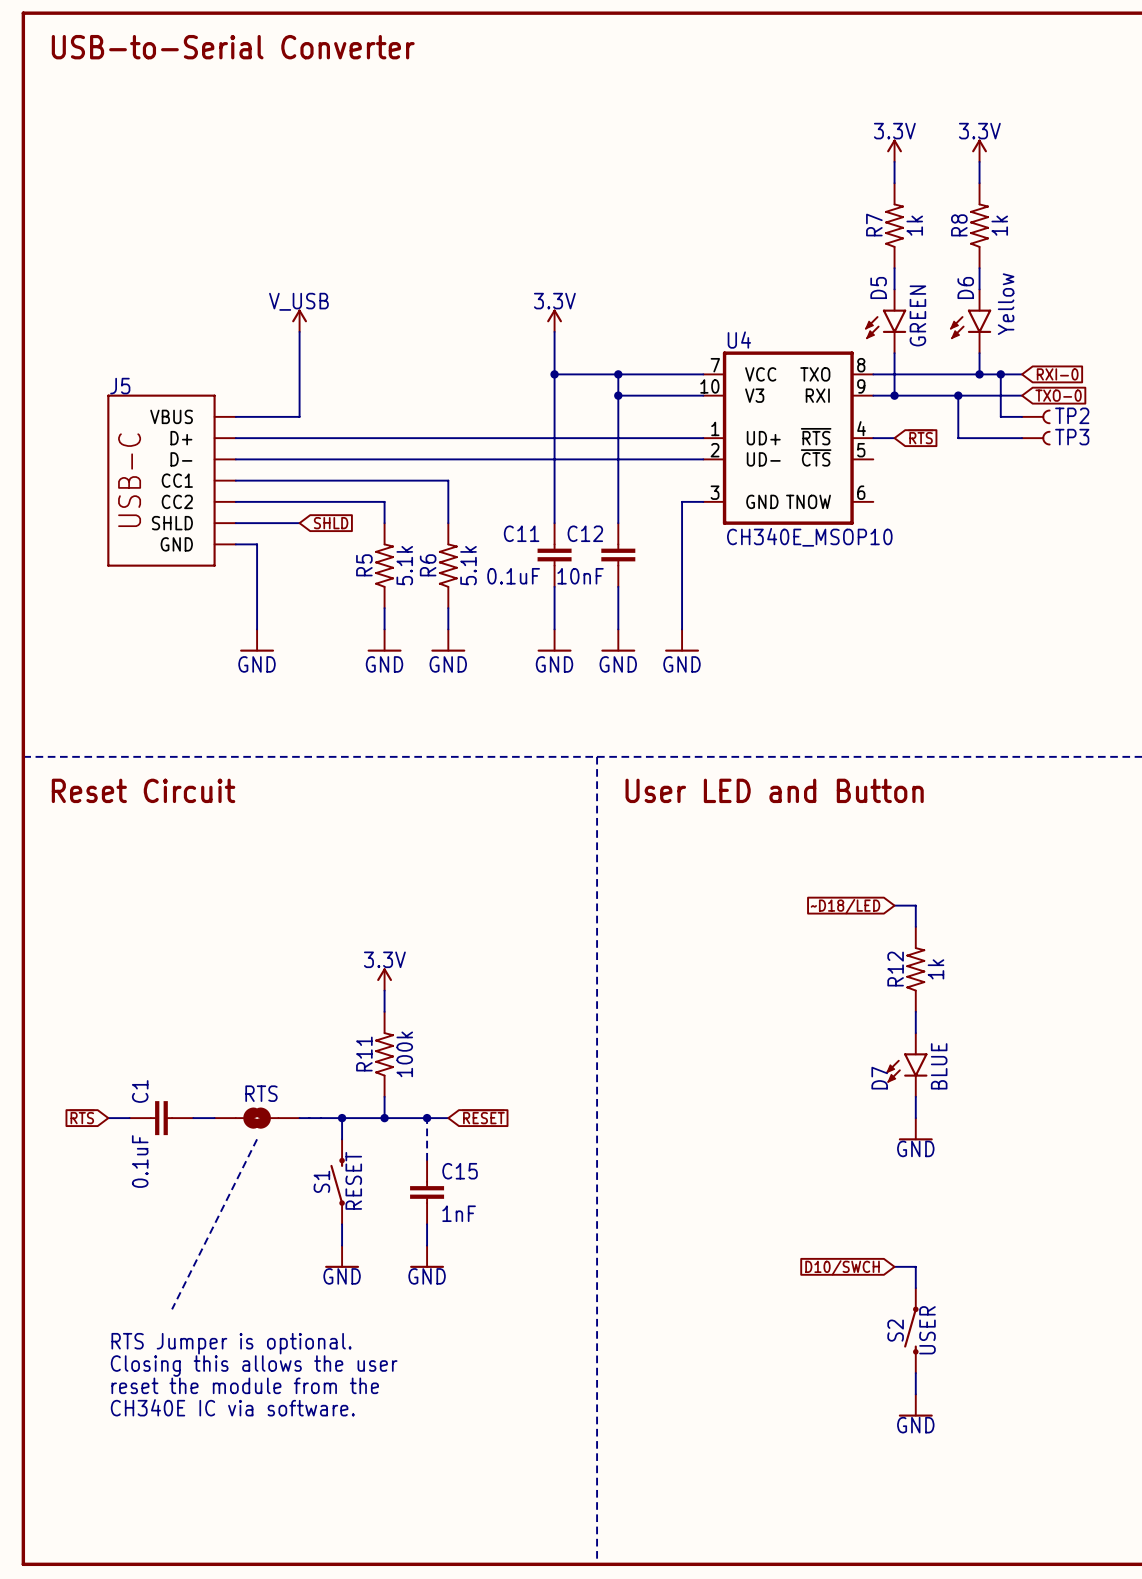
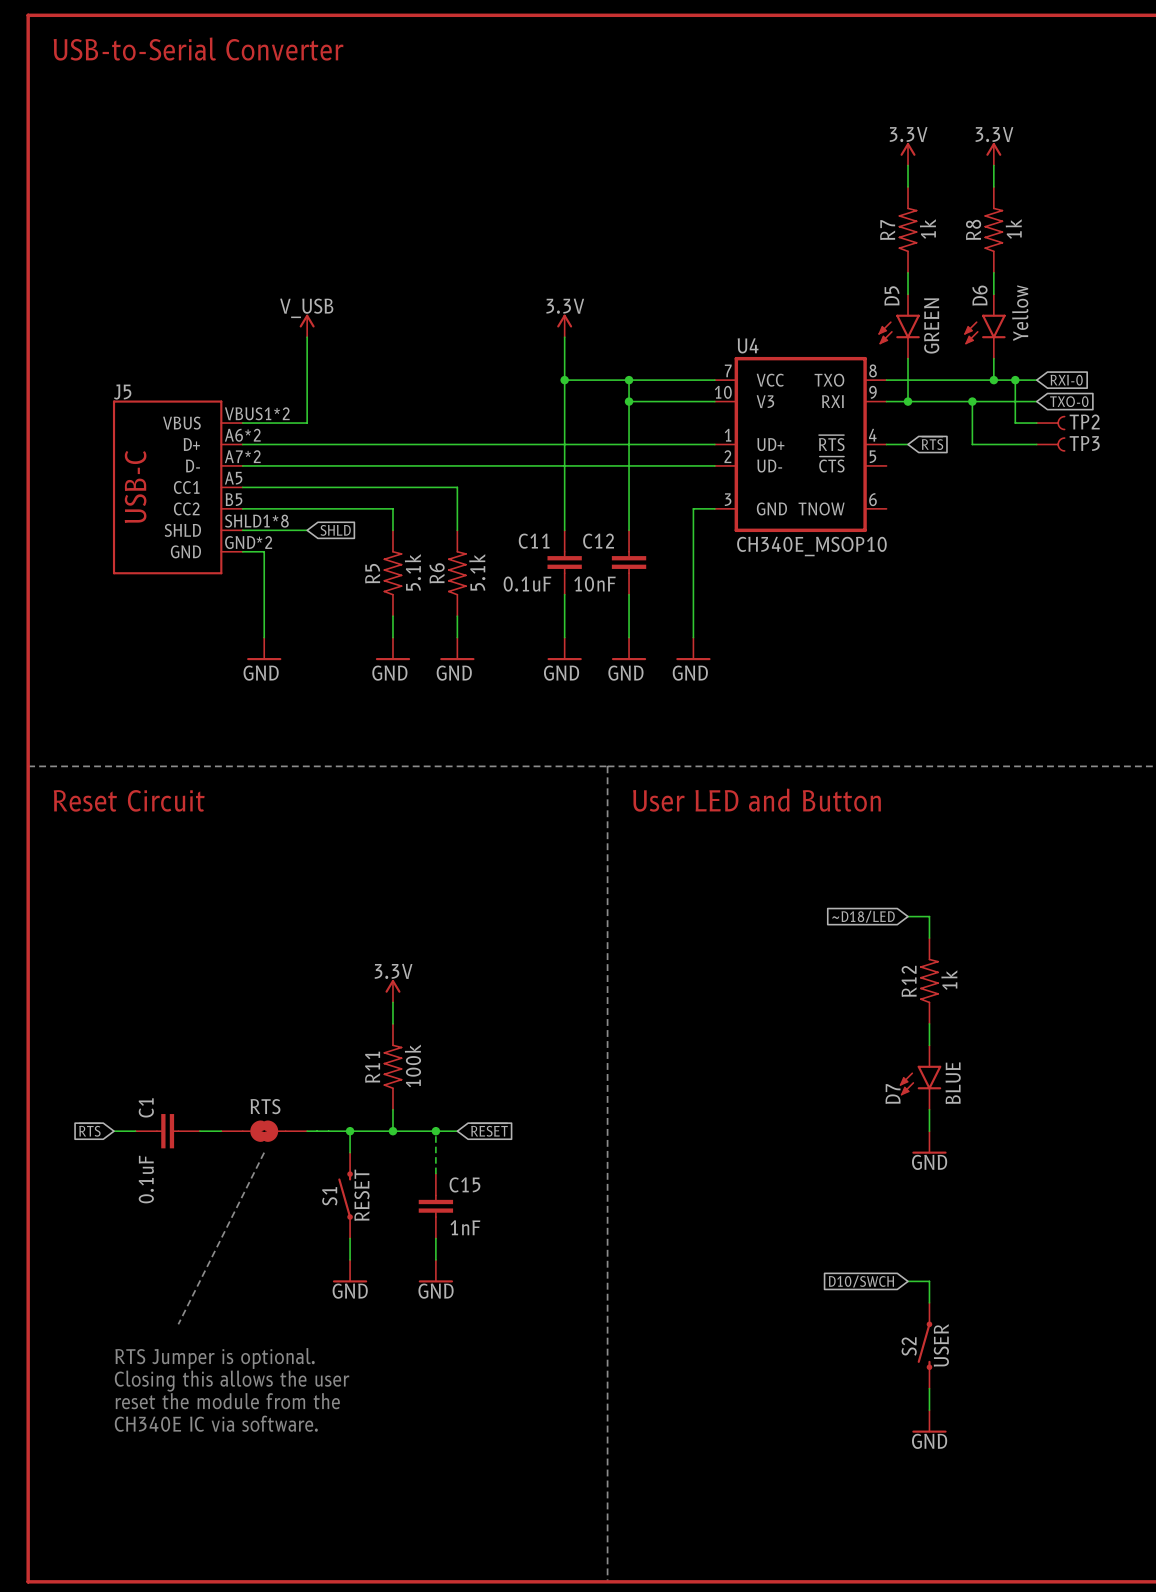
J5 pin number: none -> VBUS1*2 (257, 413)
J5 pin number: none -> A6*2 (242, 435)
J5 pin number: none -> A7*2 (242, 456)
J5 pin number: none -> A5 (233, 478)
J5 pin number: none -> B5 (234, 499)
J5 pin number: none -> SHLD1*8 (256, 521)
J5 pin number: none -> GND*2 (248, 542)

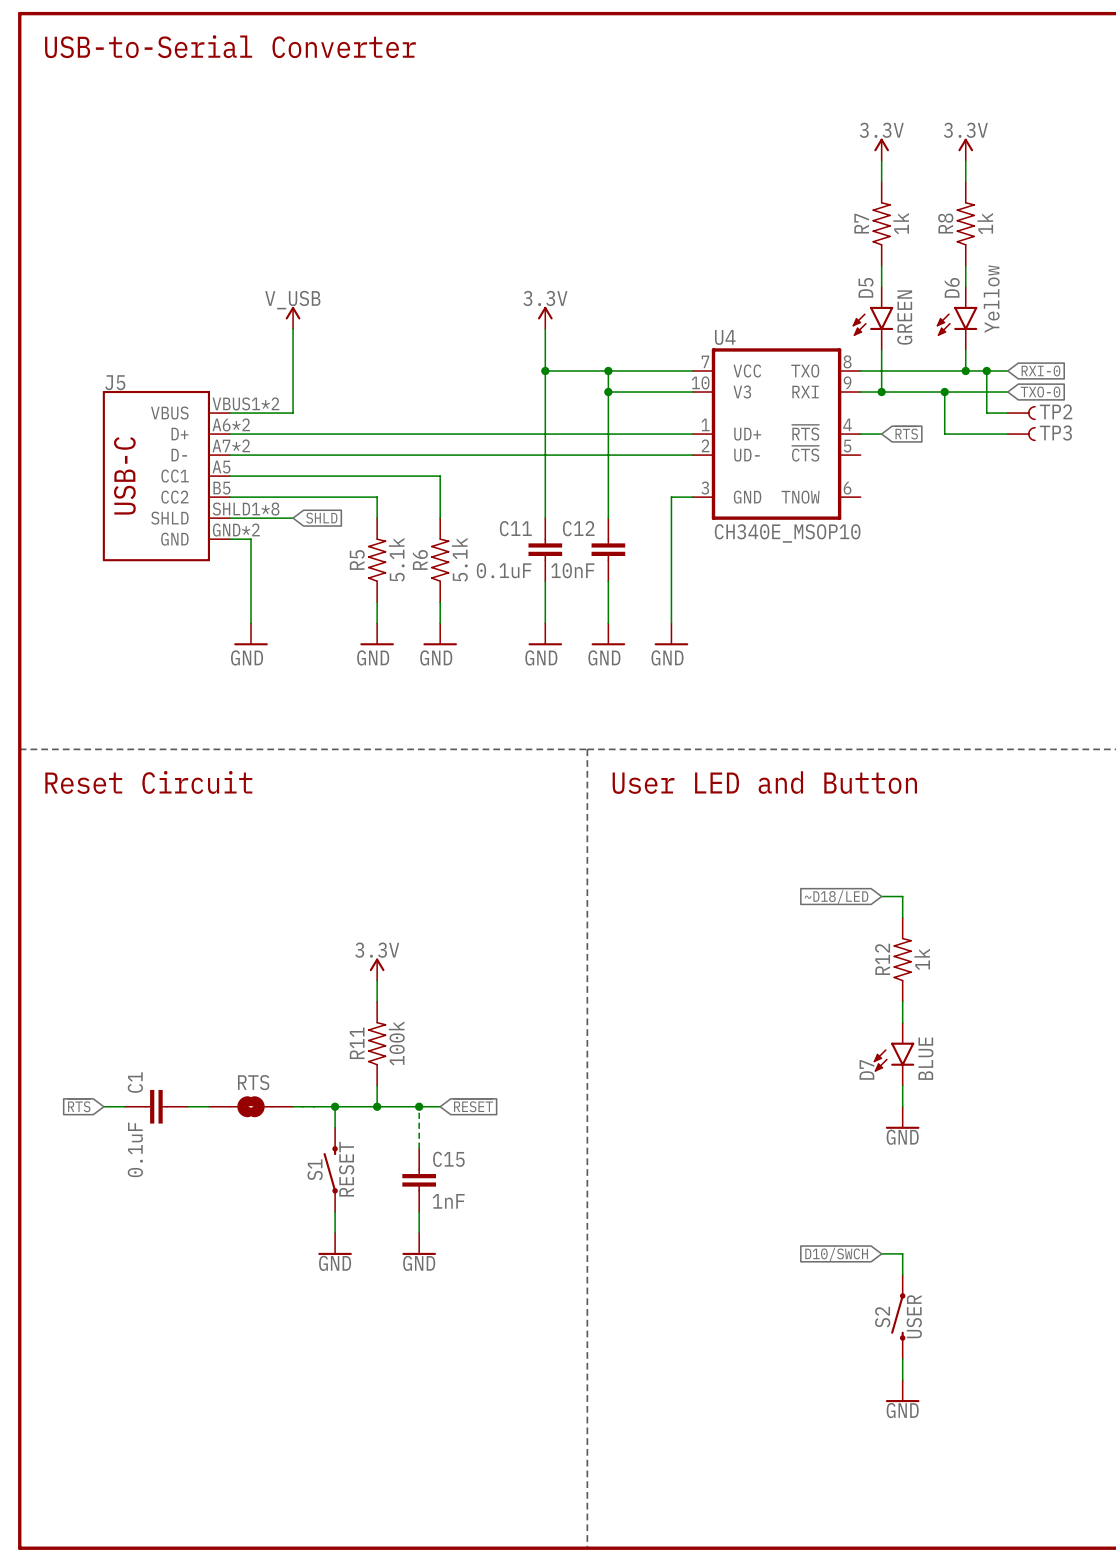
line: (264, 1152) (178, 1324) -> none
text: RTS Jumper is optional. (215, 1358) -> none
text: Closing this allows the user (232, 1381) -> none
text: reset the module from the (227, 1401) -> none
text: CH340E IC via software. (216, 1423) -> none

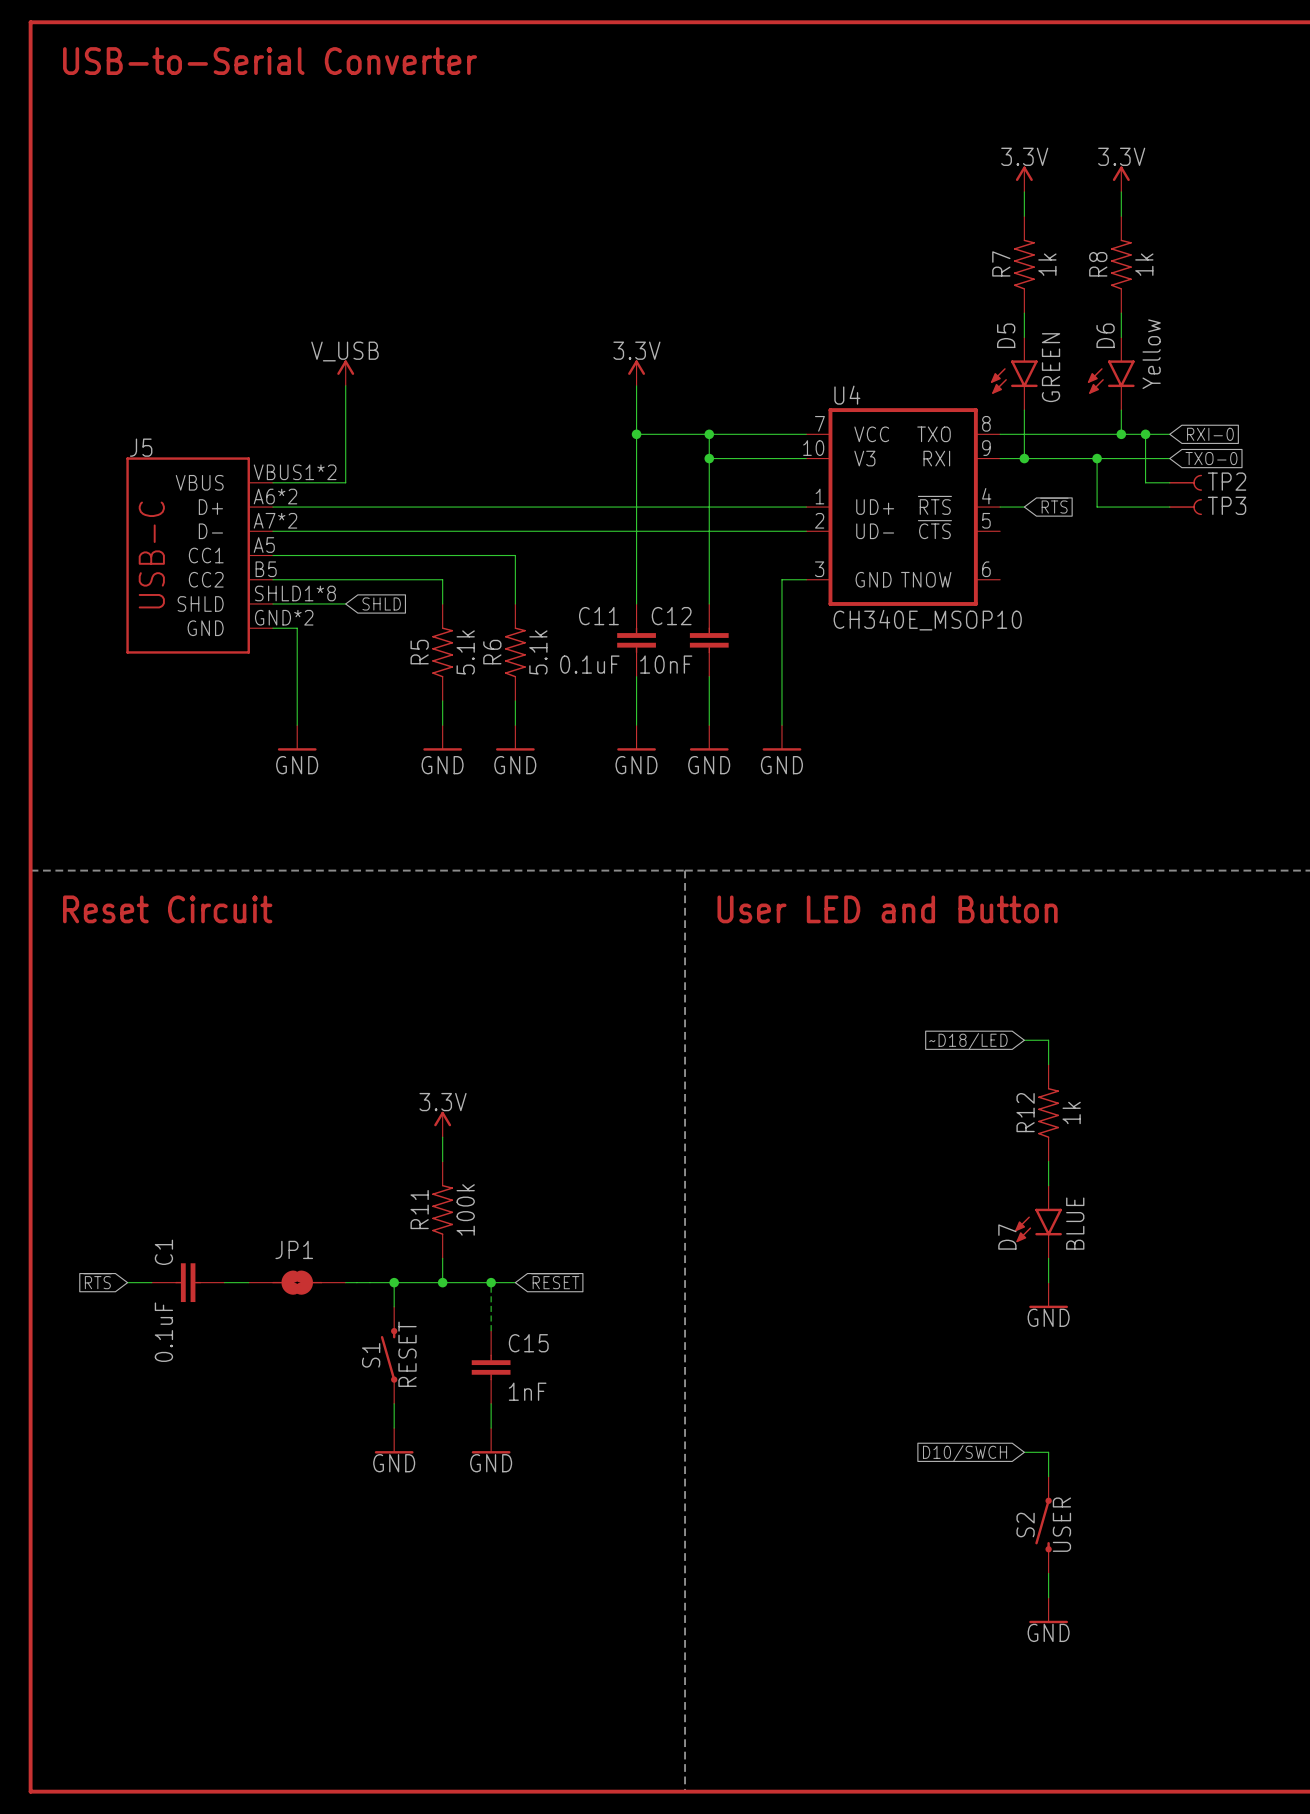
RTS name: RTS (253, 1082) -> JP1 (294, 1249)

